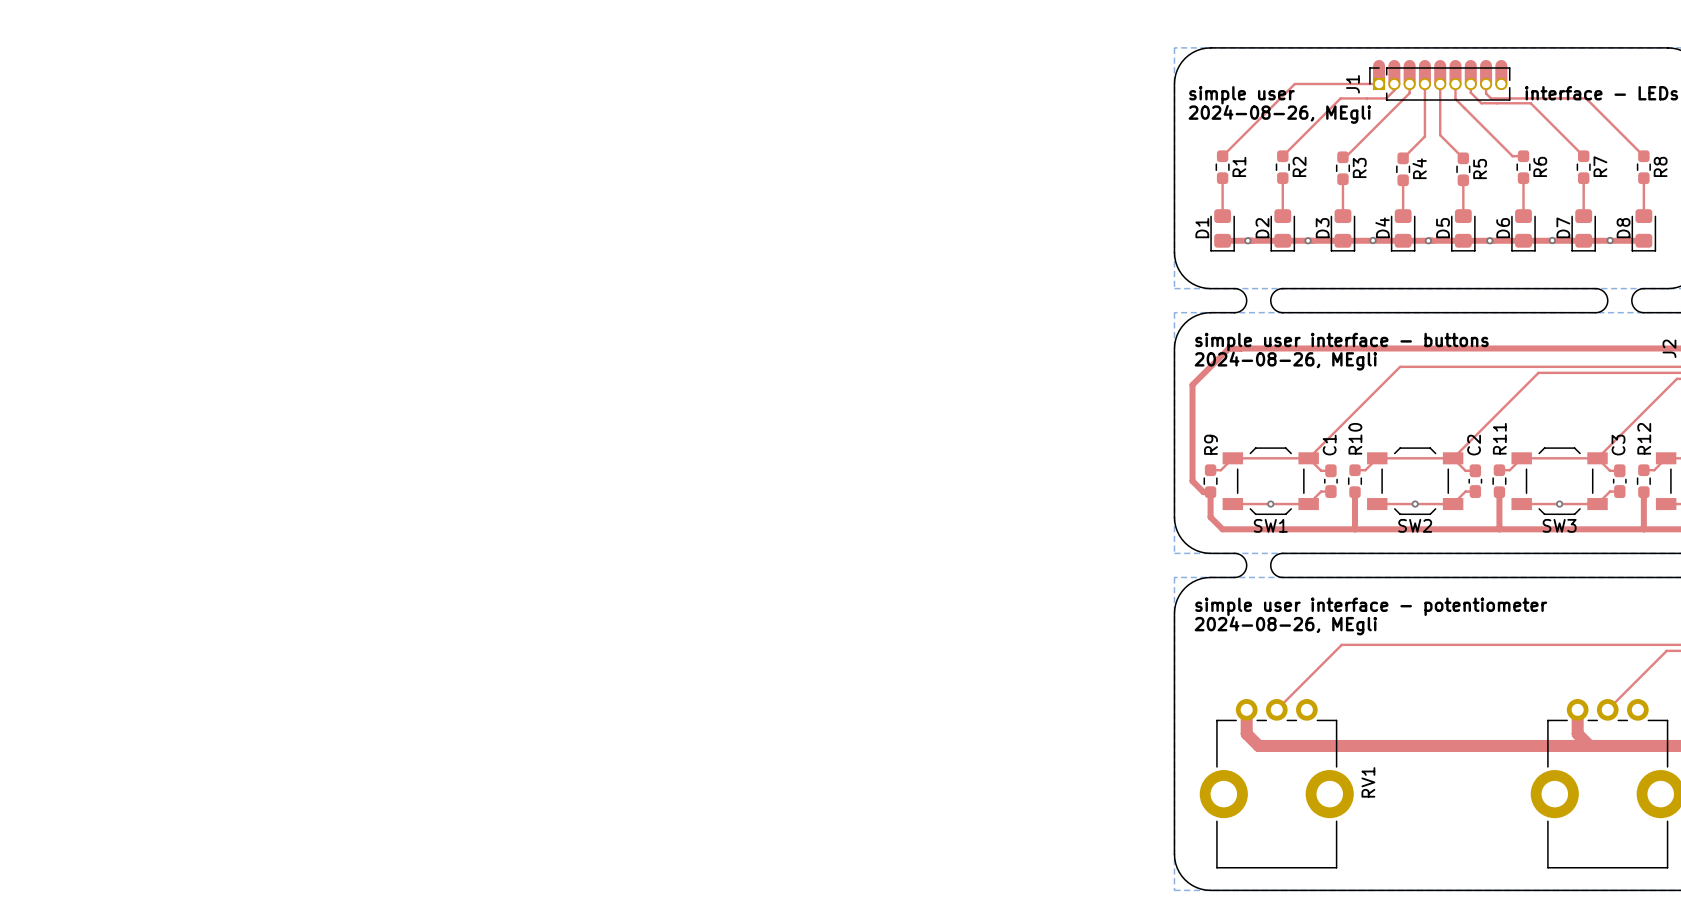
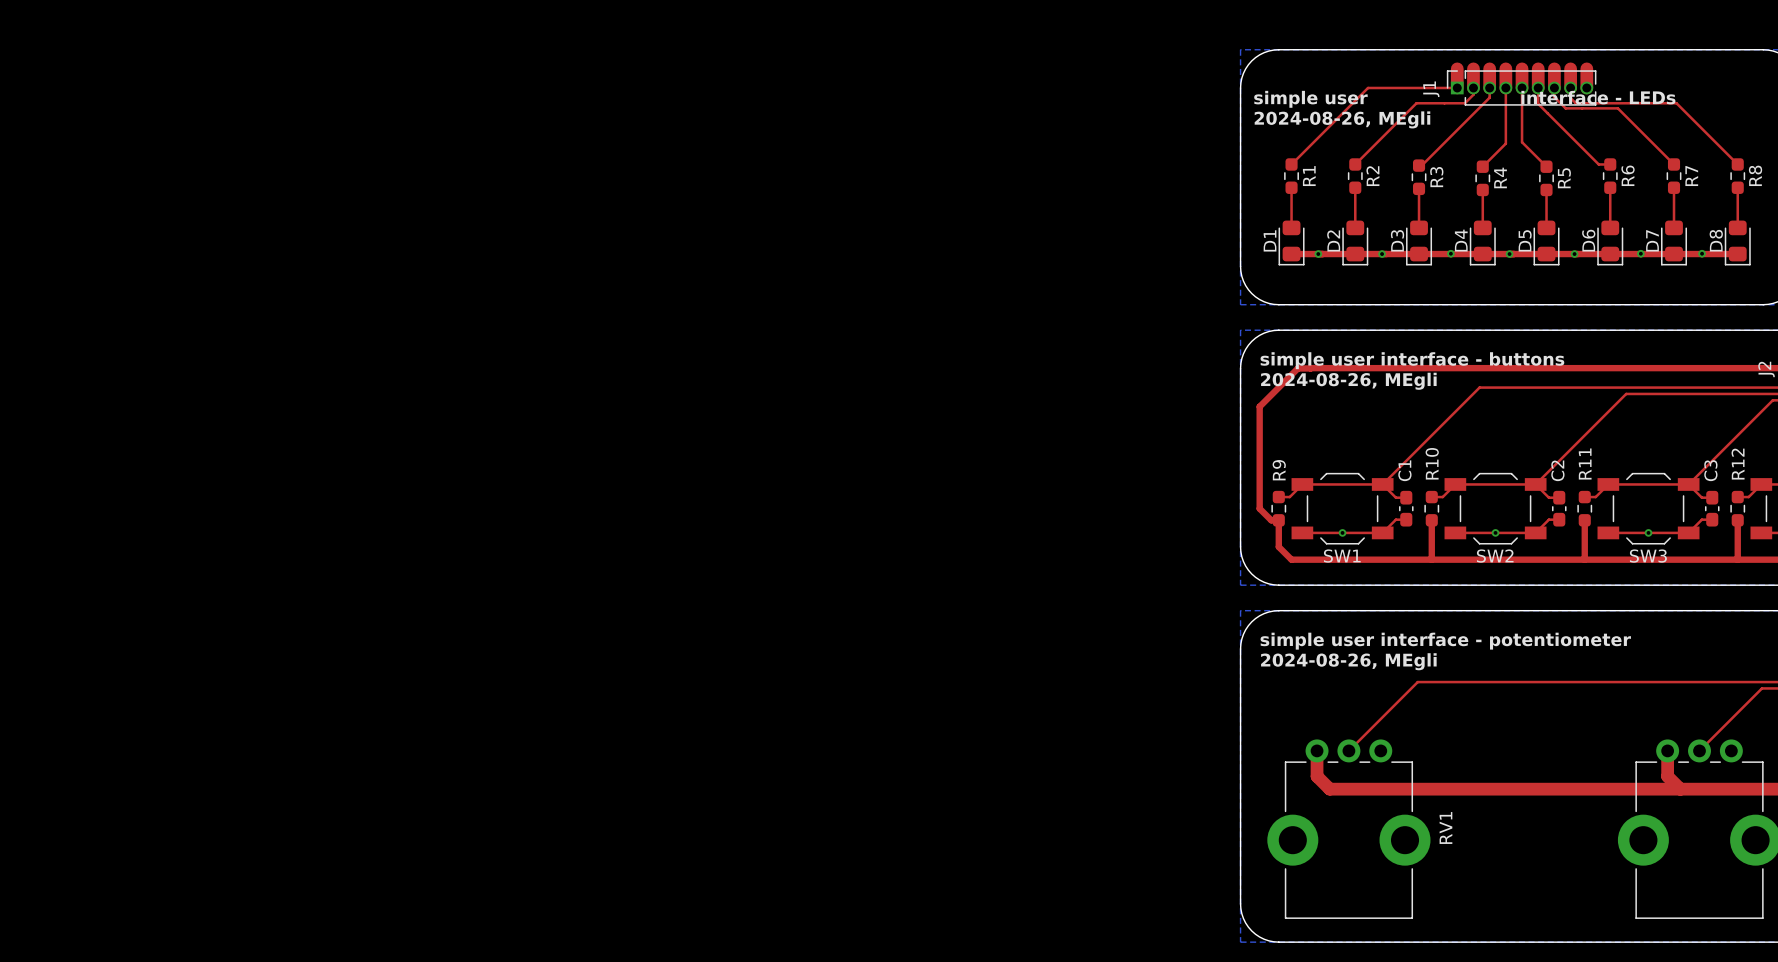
board edge: (1234, 288) (1243, 292) (1246, 300) (1243, 309) (1234, 312) -> (1304, 304) (1355, 304)
board edge: (1282, 288) (1274, 292) (1270, 300) (1274, 309) (1282, 312) -> (1304, 330) (1355, 330)
board edge: (1595, 288) (1604, 292) (1607, 300) (1604, 309) (1595, 312) -> (1686, 304) (1737, 304)
board edge: (1643, 288) (1635, 292) (1631, 300) (1635, 309) (1643, 312) -> (1686, 330) (1737, 330)
board edge: (1234, 553) (1243, 556) (1246, 565) (1243, 573) (1234, 577) -> (1304, 585) (1355, 585)
board edge: (1282, 553) (1274, 556) (1270, 565) (1274, 573) (1282, 577) -> (1304, 610) (1355, 610)

